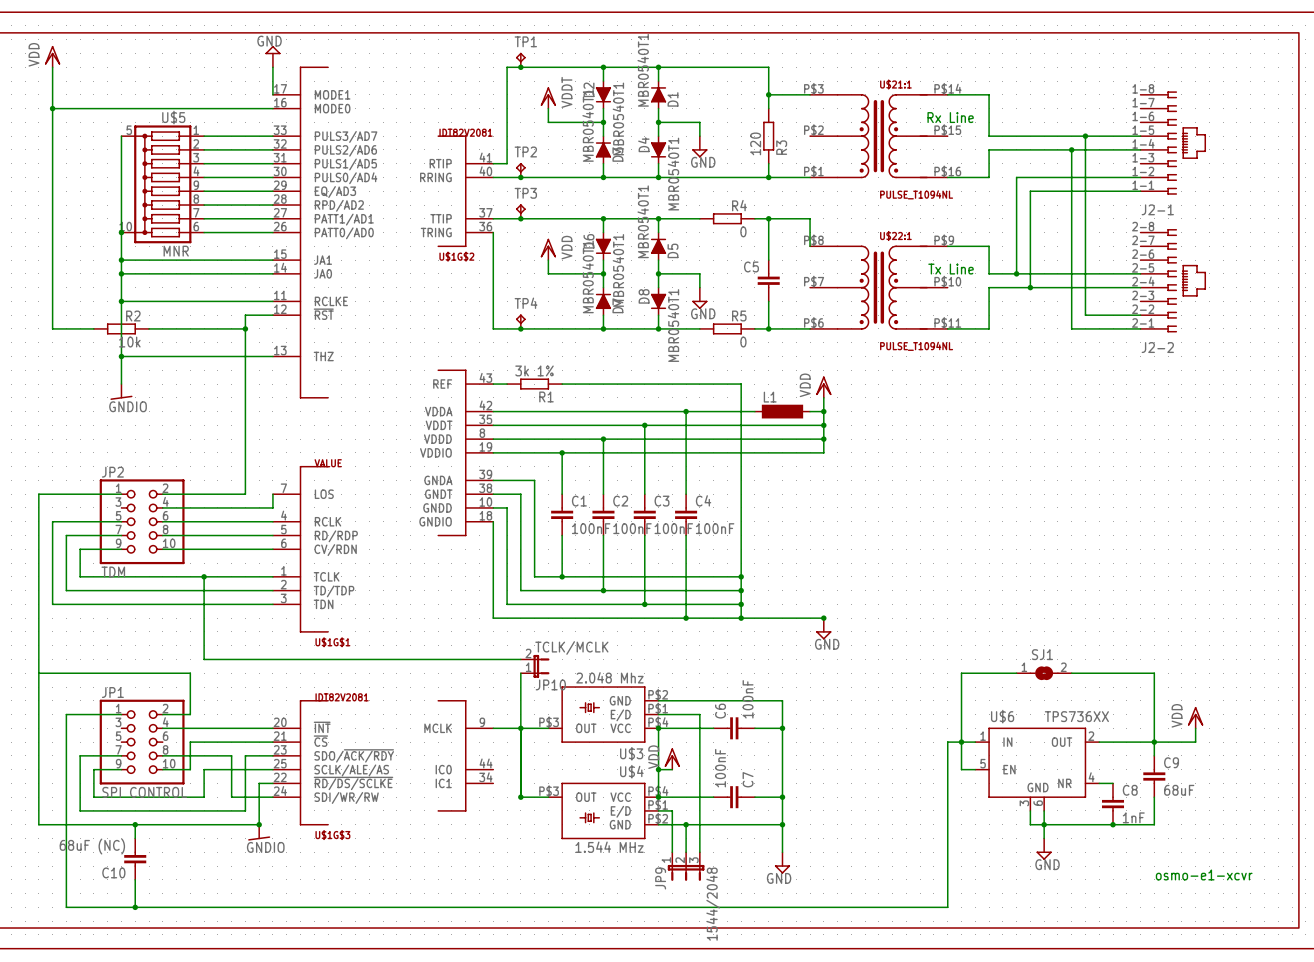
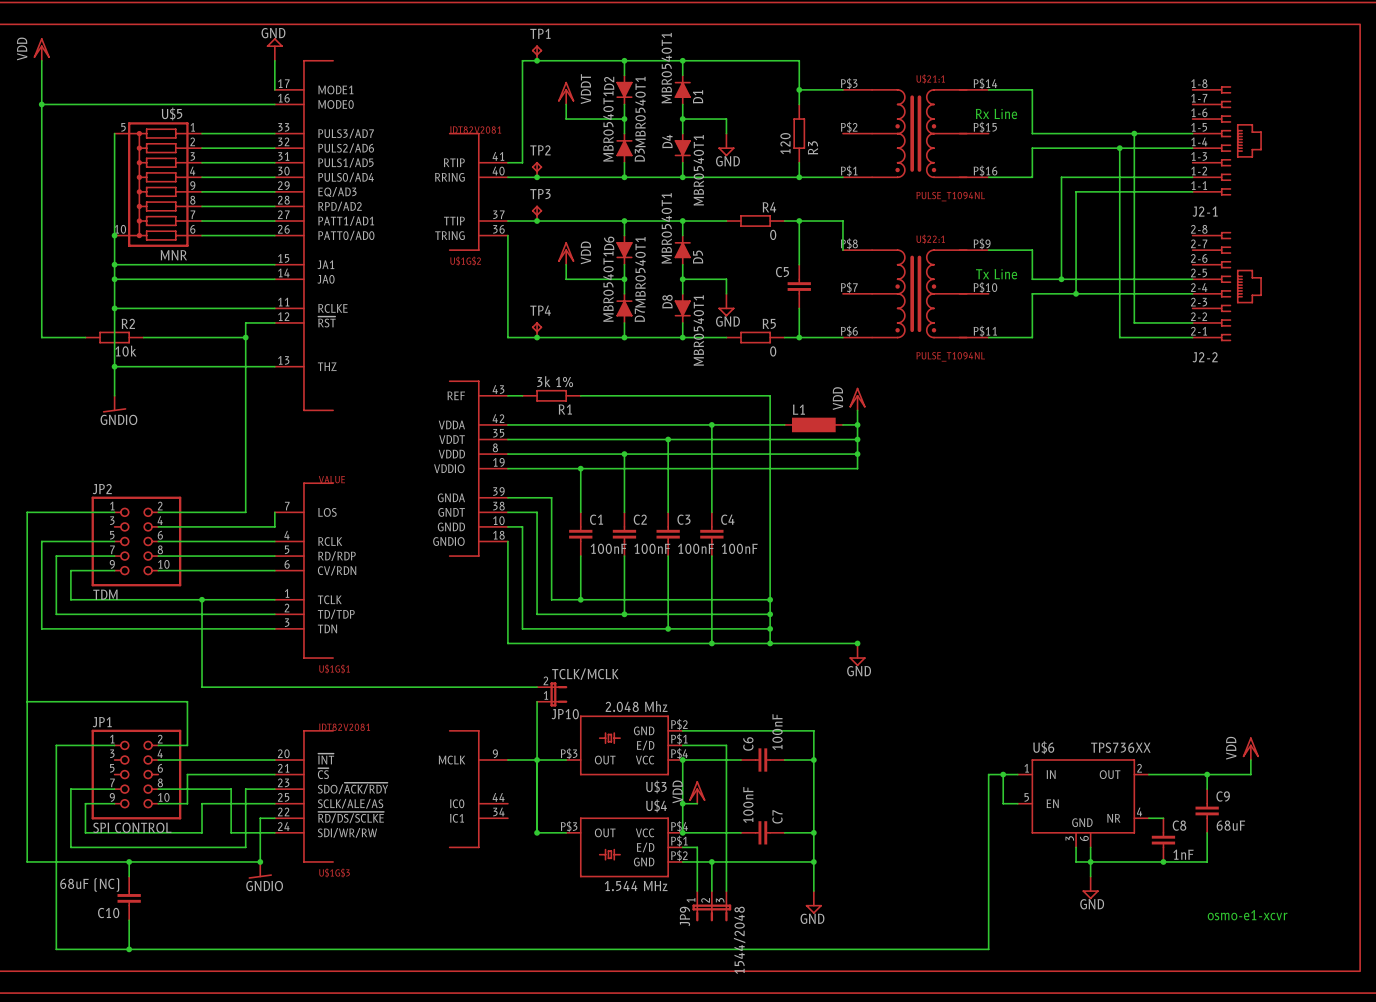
wire: (1016, 673) (961, 673) (961, 742) -> none
SJ1: (1044, 673) -> none
wire: (1071, 673) (1154, 673) (1154, 742) -> none

